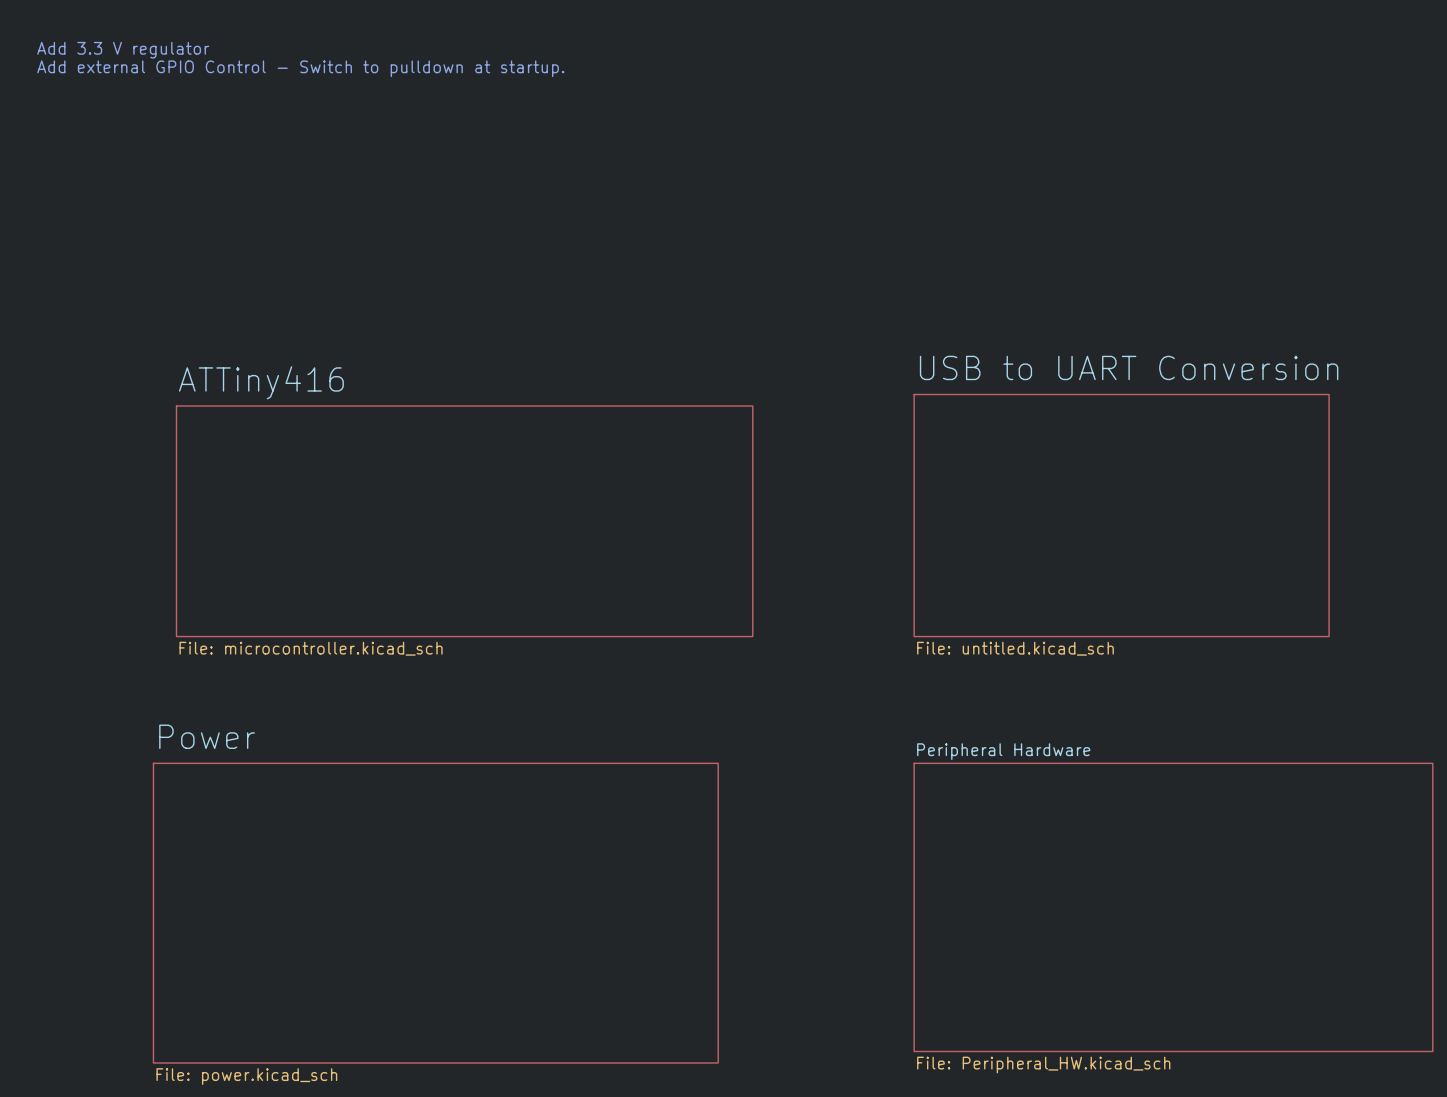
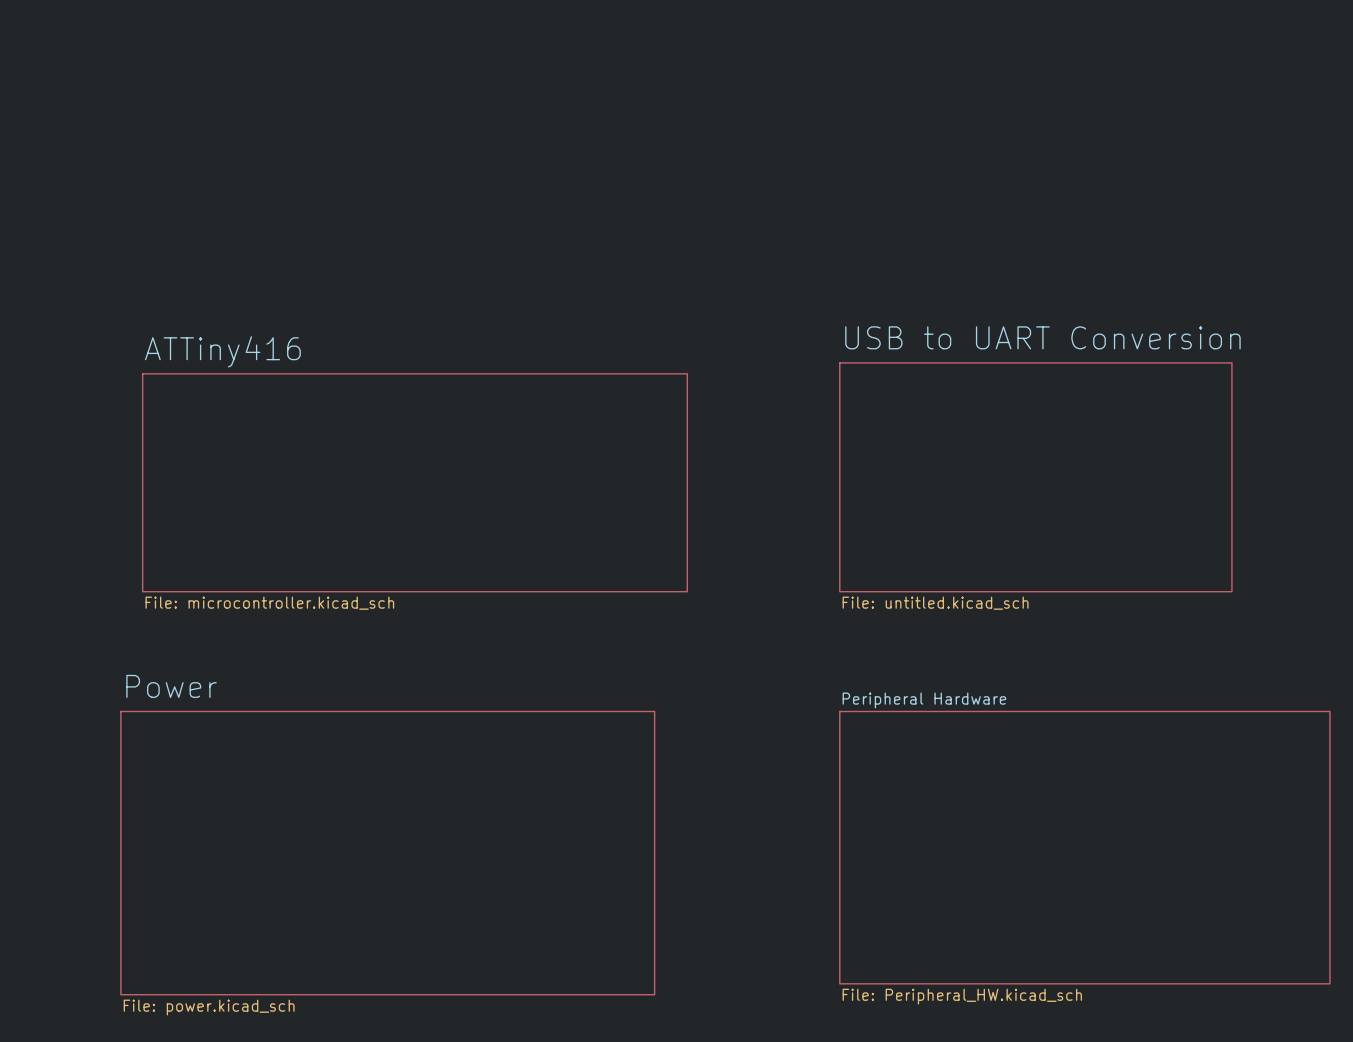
text: Add 3.3 V regulator (123, 50) -> none
text: Add external GPIO Control - Switch to pulldown at startup. (300, 68) -> none

